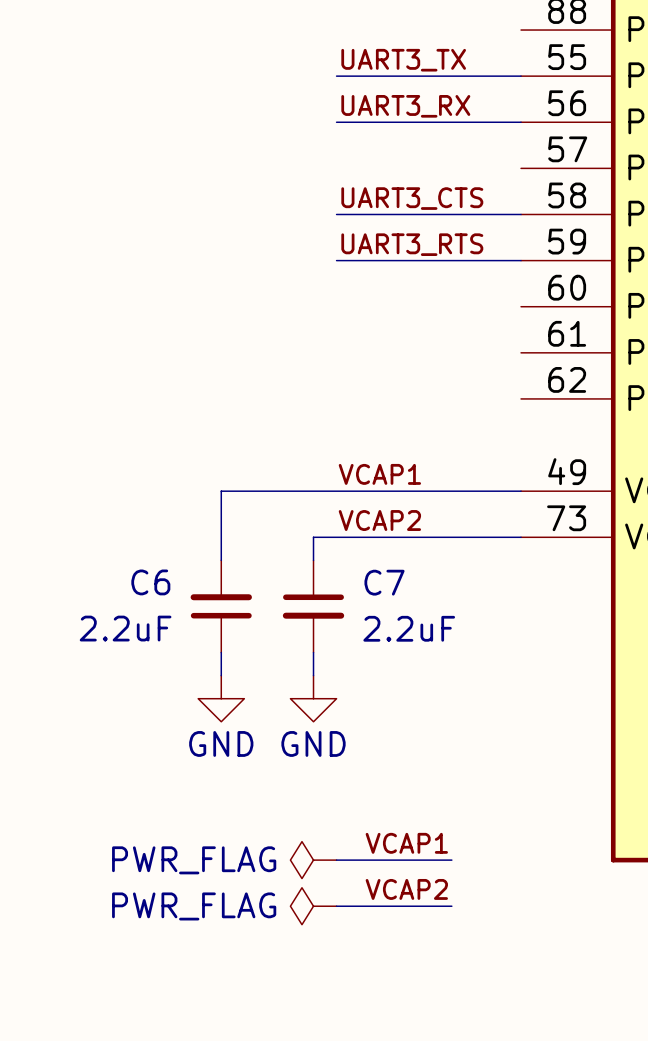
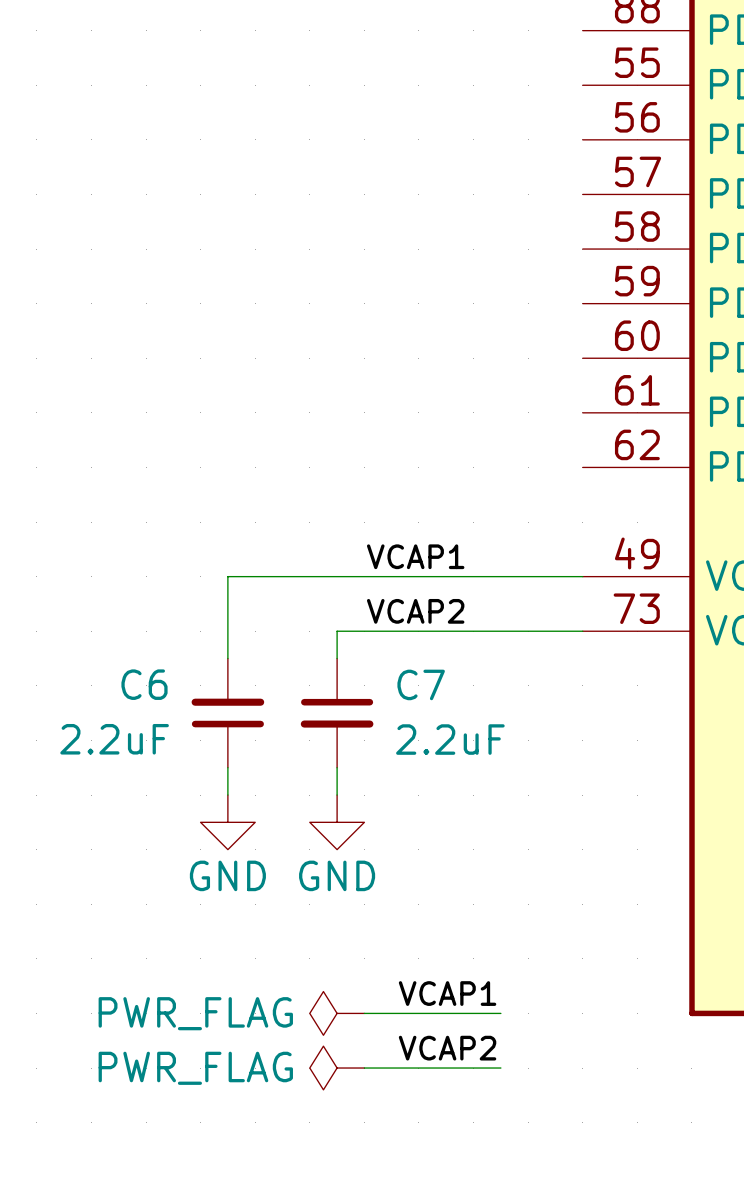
label: UART3_TX (403, 60) -> none
wire: (336, 76) (521, 76) -> none
label: UART3_RX (405, 106) -> none
wire: (336, 122) (521, 122) -> none
label: UART3_CTS (412, 198) -> none
wire: (336, 214) (521, 214) -> none
label: UART3_RTS (412, 244) -> none
wire: (336, 260) (521, 260) -> none

